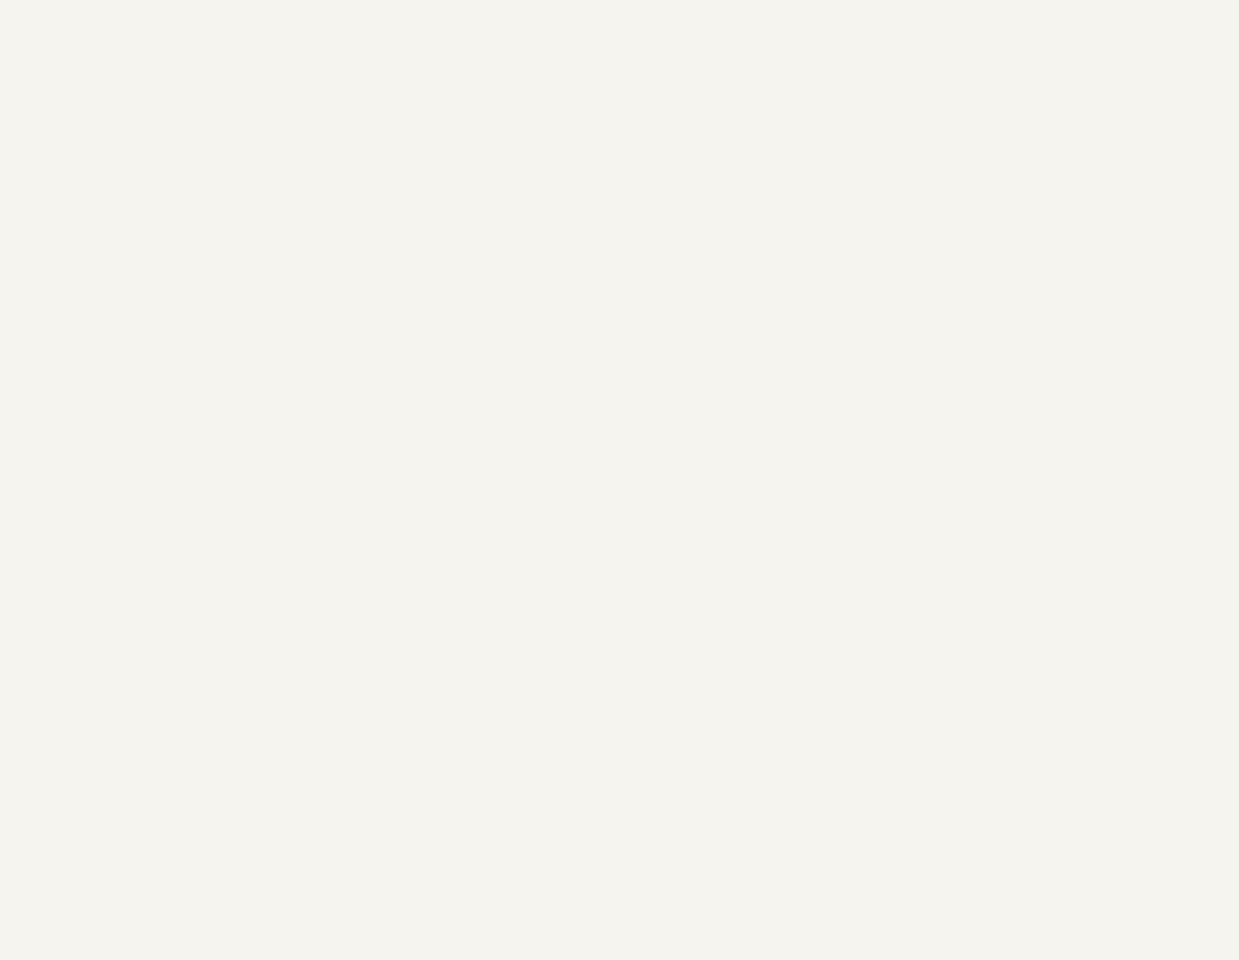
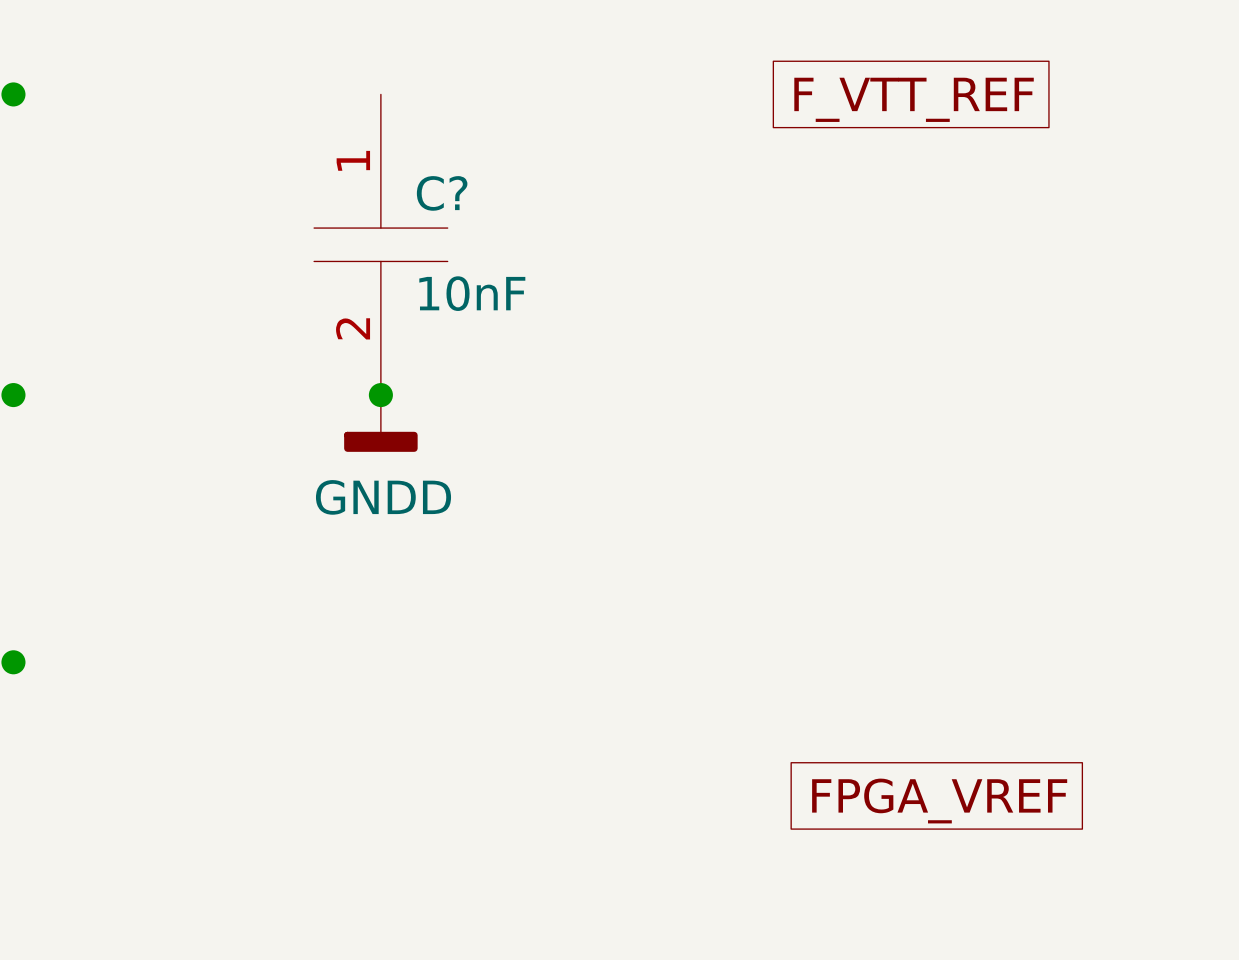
junction: none -> (13, 94)
global label: none -> F_VTT_REF (914, 99)
C?: none -> (380, 244)
junction: none -> (13, 395)
junction: none -> (380, 395)
power symbol: none -> GNDD (380, 423)
junction: none -> (13, 662)
global label: none -> FPGA_VREF (939, 801)

